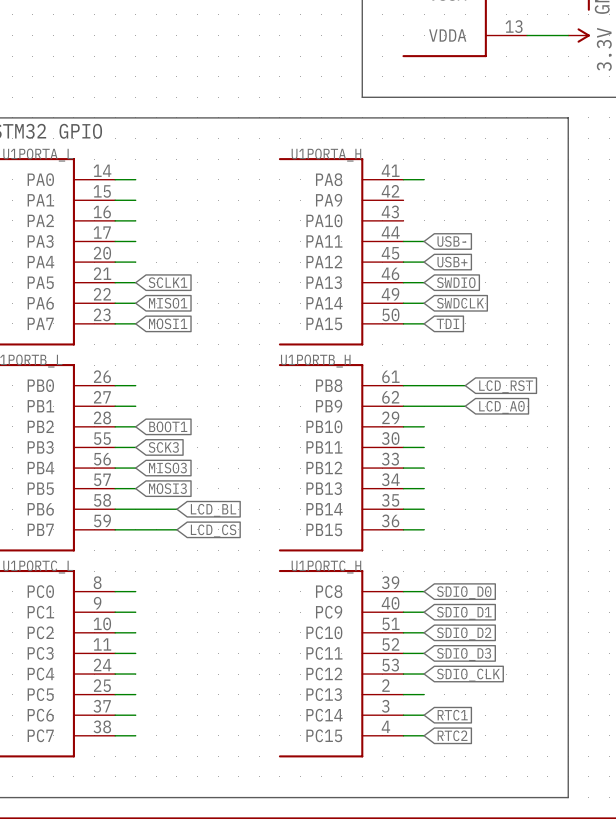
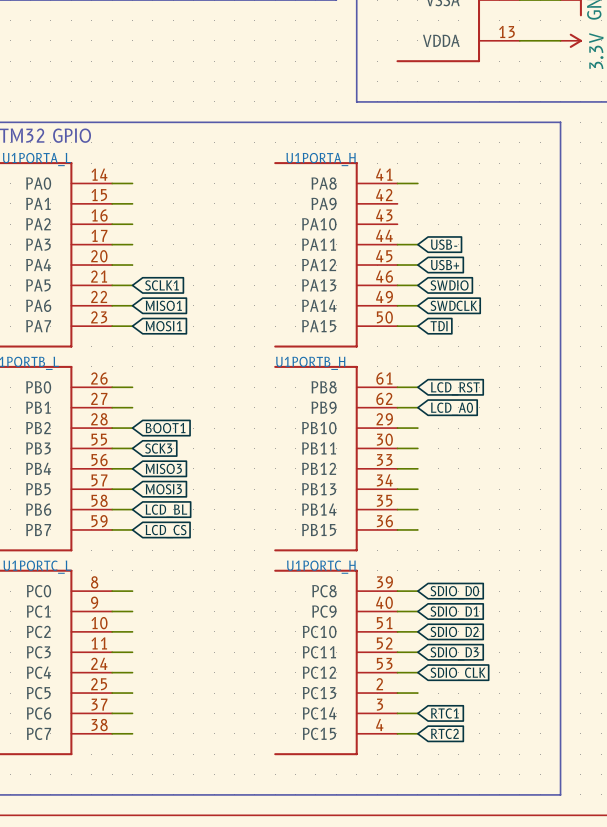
wire: (424, 385) (465, 385) -> none
global label position: LCD_RST (506, 386) -> LCD_RST (455, 388)
wire: (424, 406) (465, 406) -> none
global label position: LCD_A0 (501, 407) -> LCD_A0 (452, 409)
wire: (135, 509) (176, 509) -> none
global label position: LCD_BL (213, 510) -> LCD_BL (166, 511)
wire: (135, 529) (176, 529) -> none
global label position: LCD_CS (213, 530) -> LCD_CS (166, 531)

